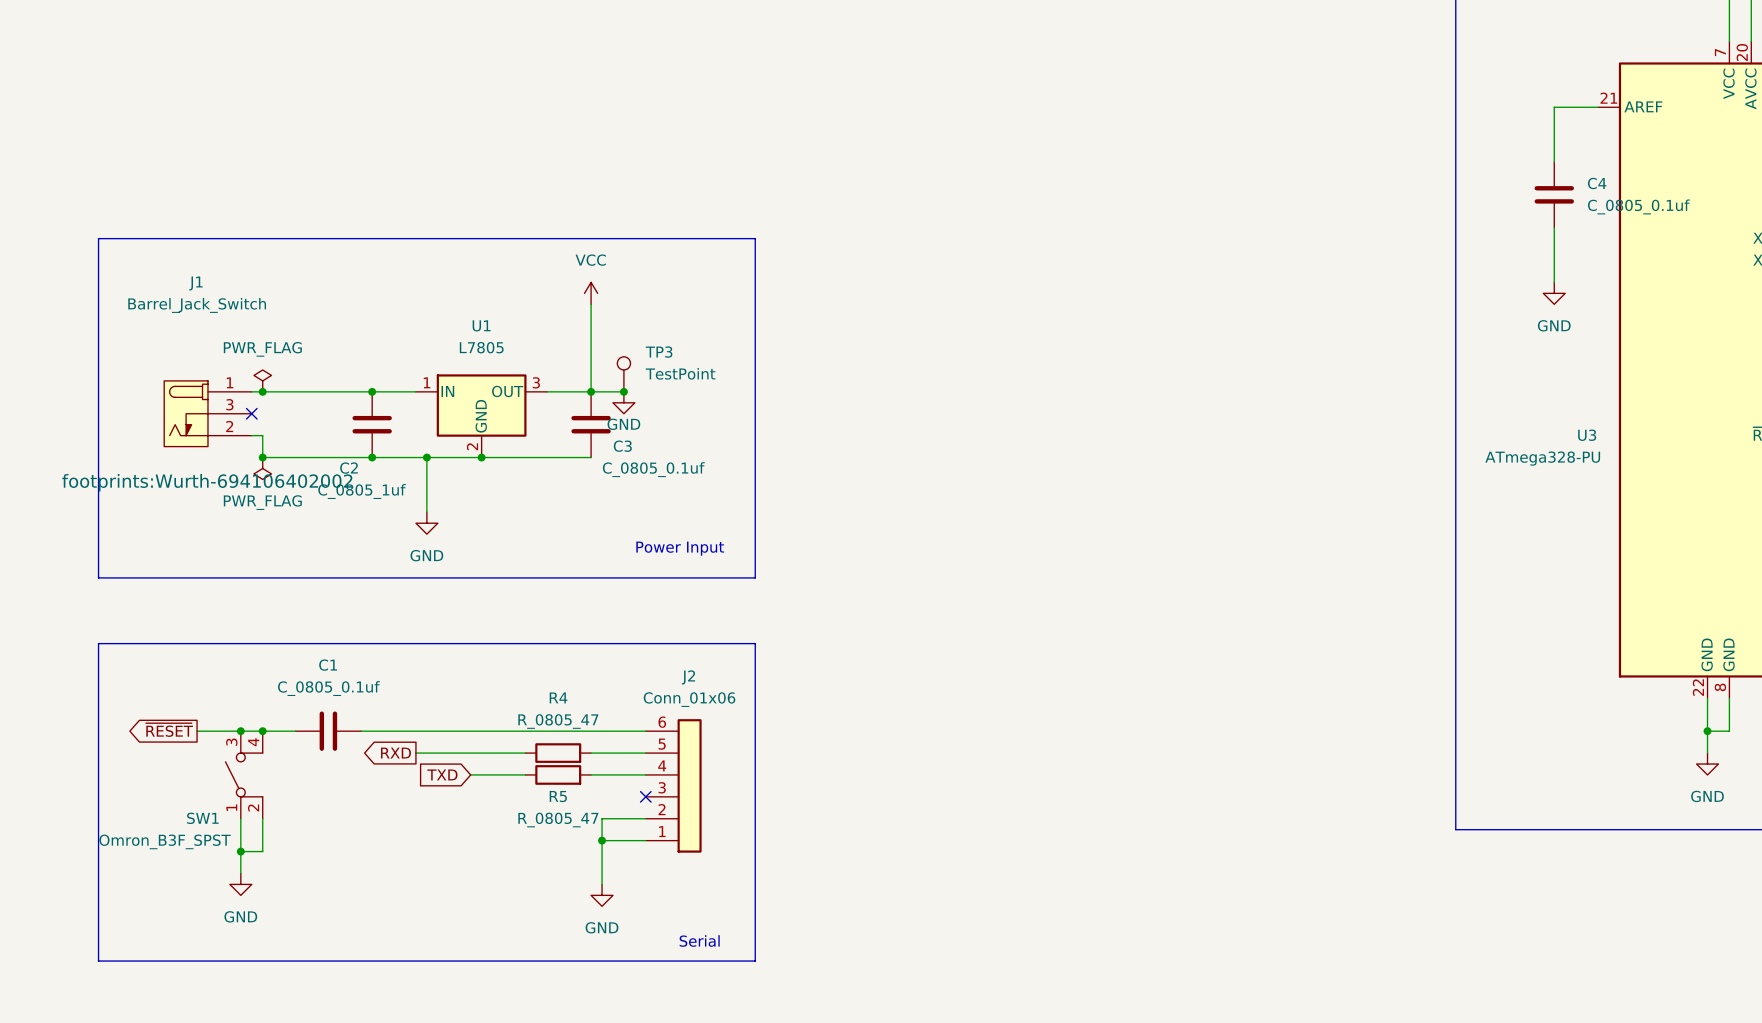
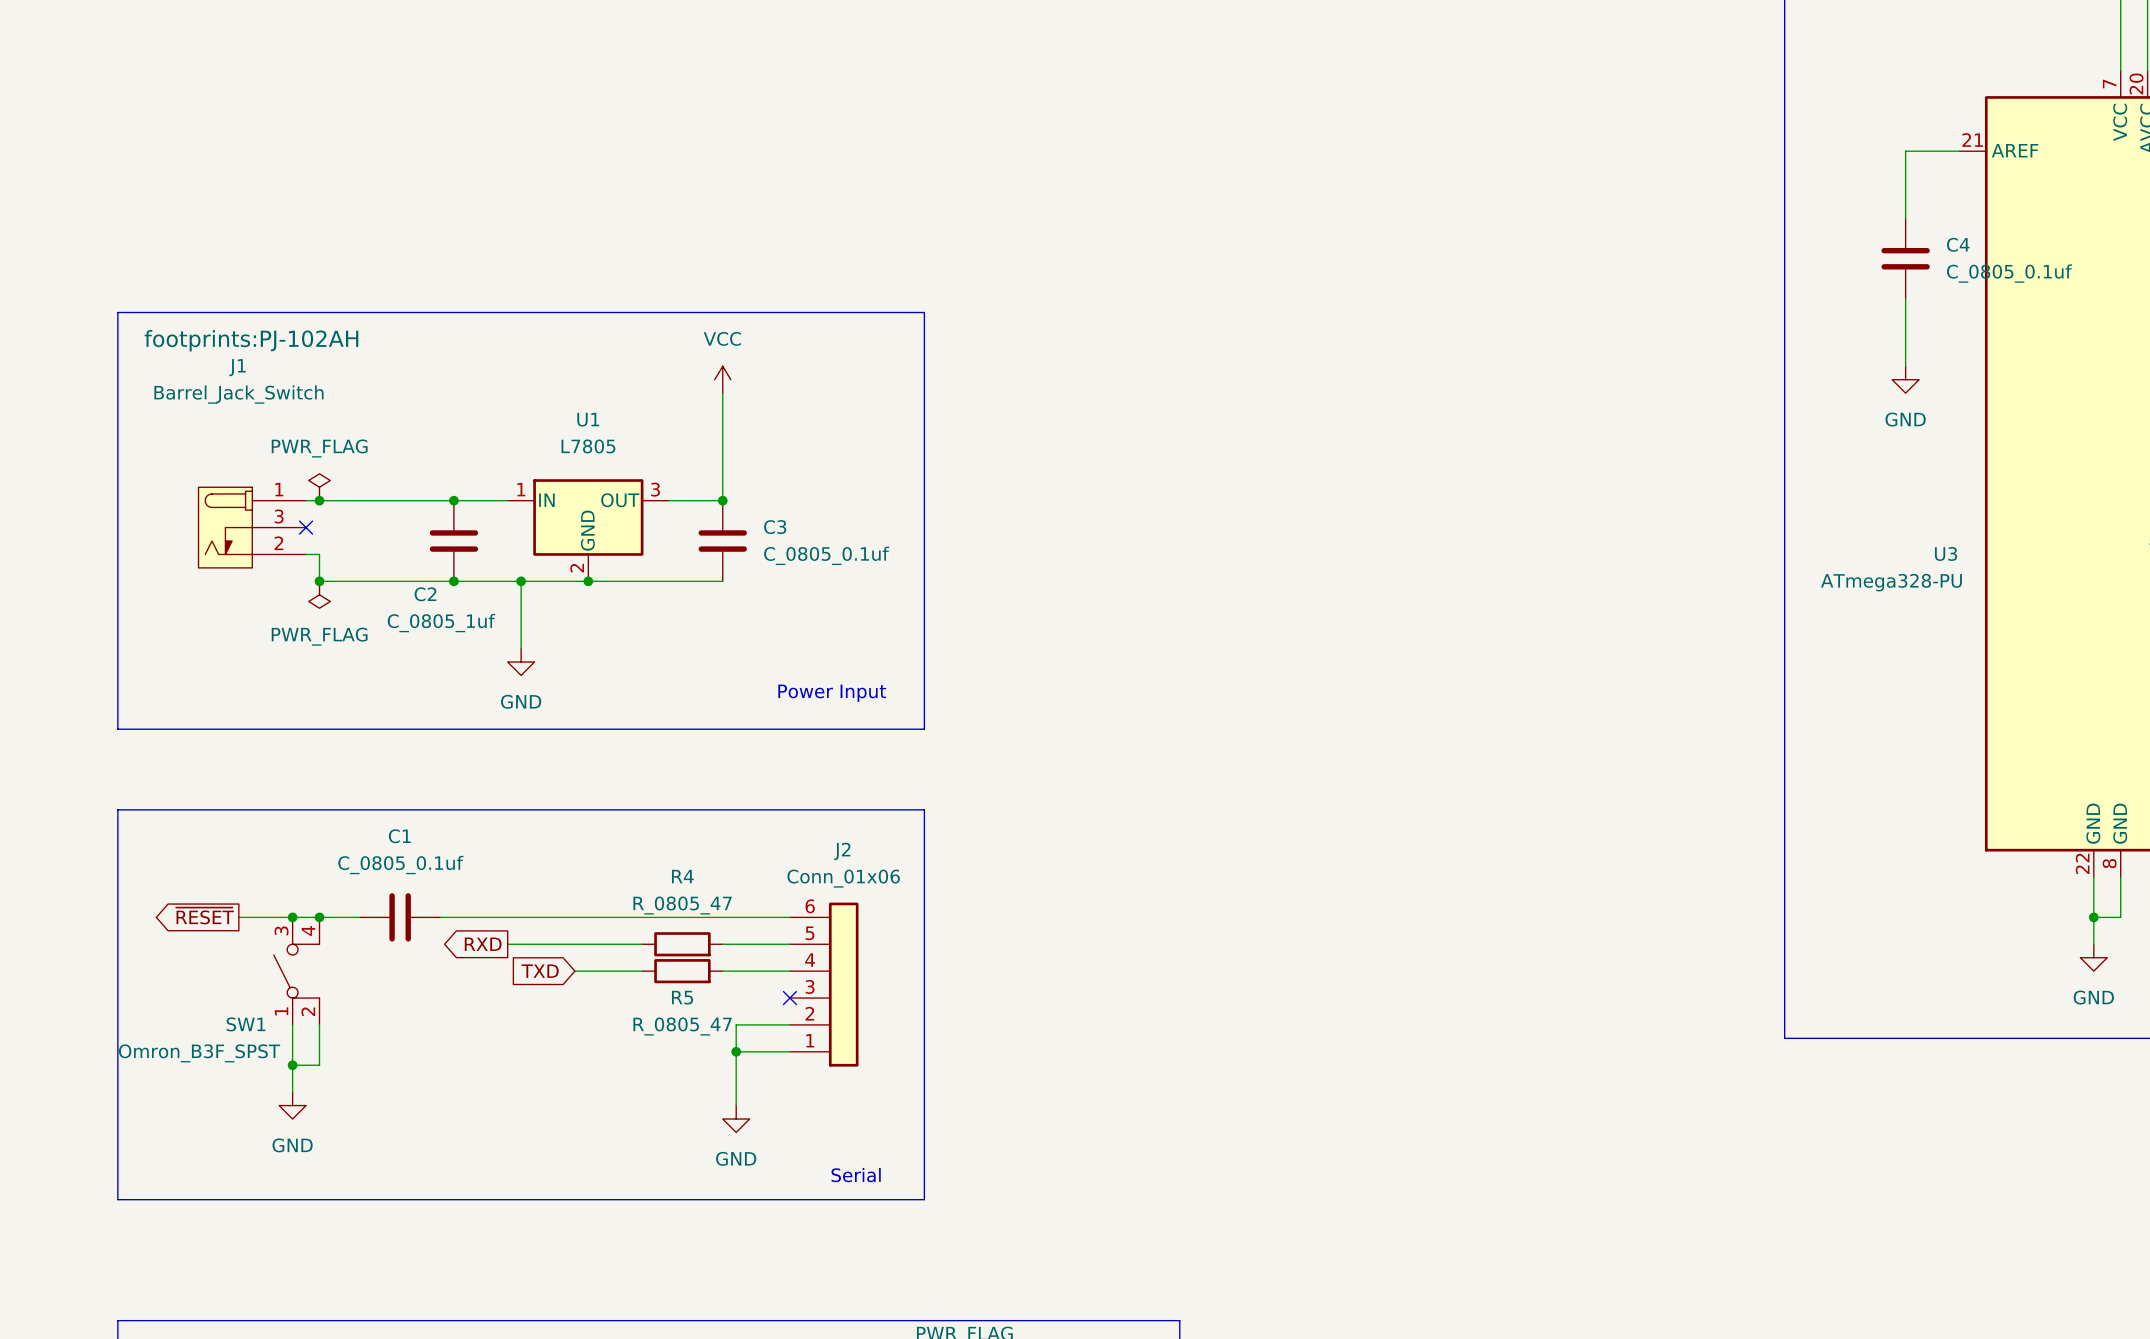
TP3: TestPoint (623, 374) -> none
wire: (591, 391) (623, 391) -> none
junction: (623, 391) -> none
power symbol: GND (623, 402) -> none
C3 name position: C3 (622, 446) -> C3 (775, 527)
C3 value position: C_0805_0.1uf (653, 469) -> C_0805_0.1uf (826, 555)
J1 text: footprints:Wurth-694106402002 (207, 482) -> footprints:PJ-102AH (251, 340)

